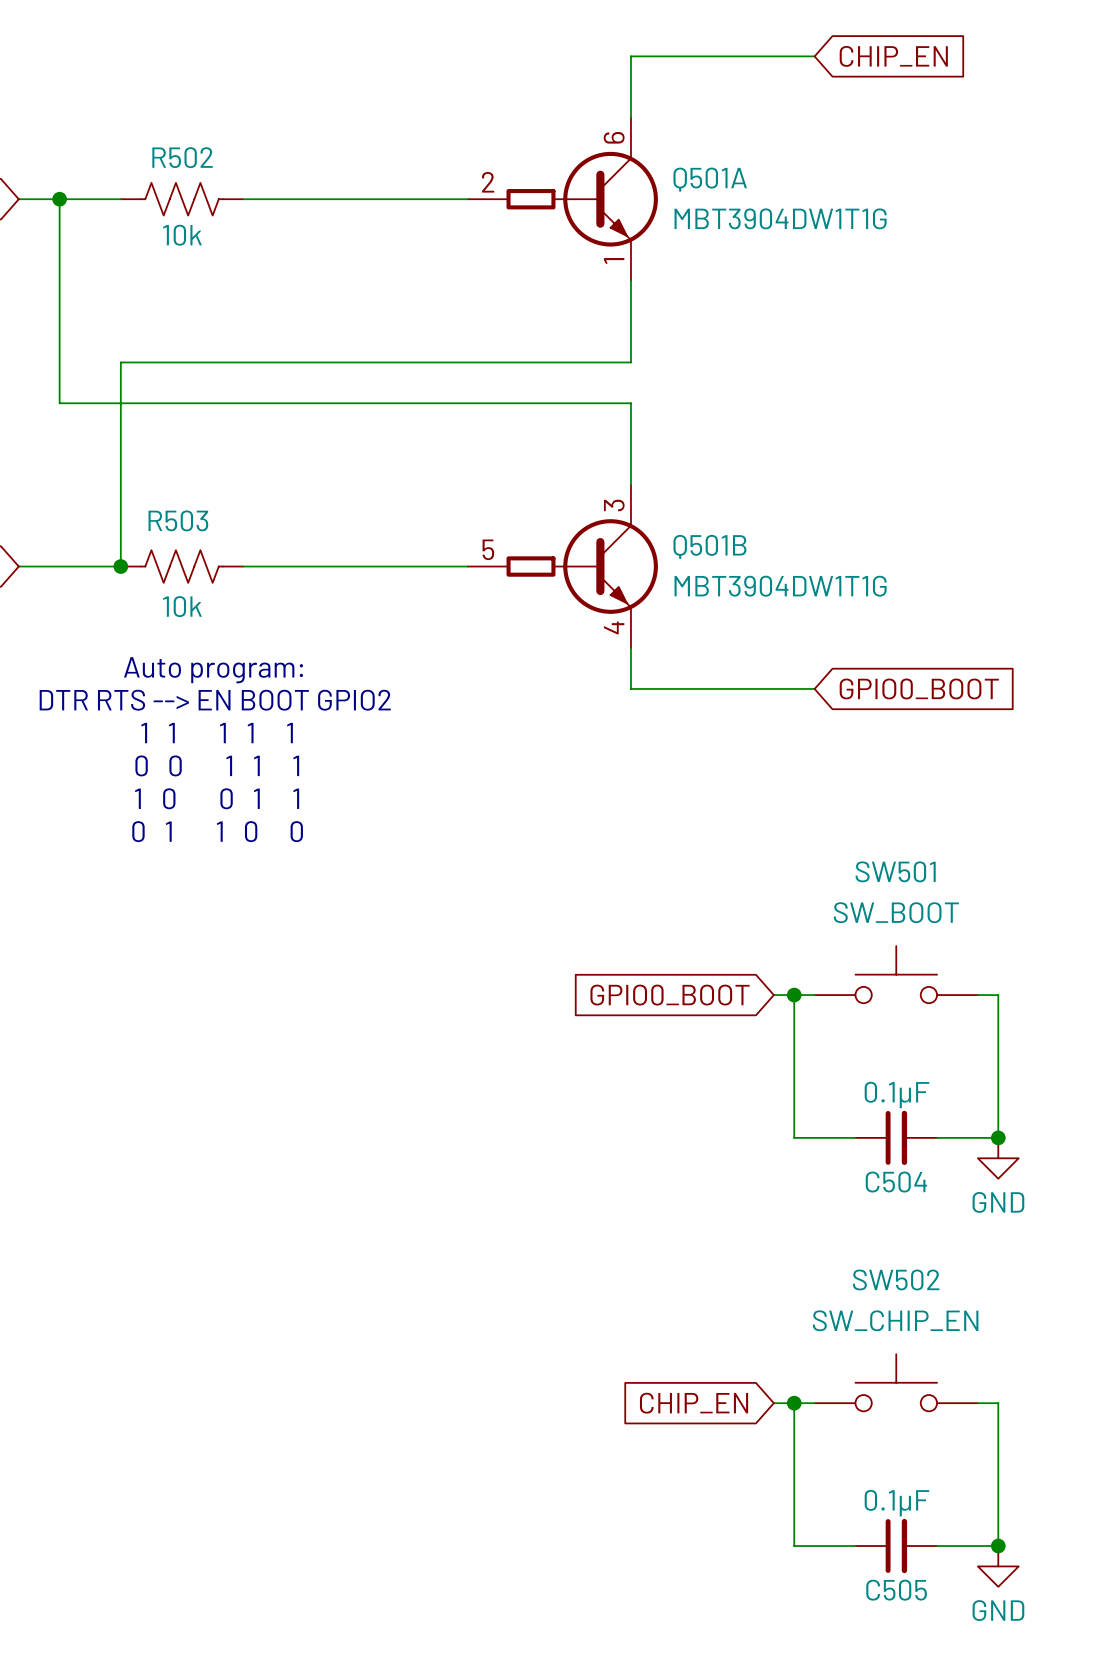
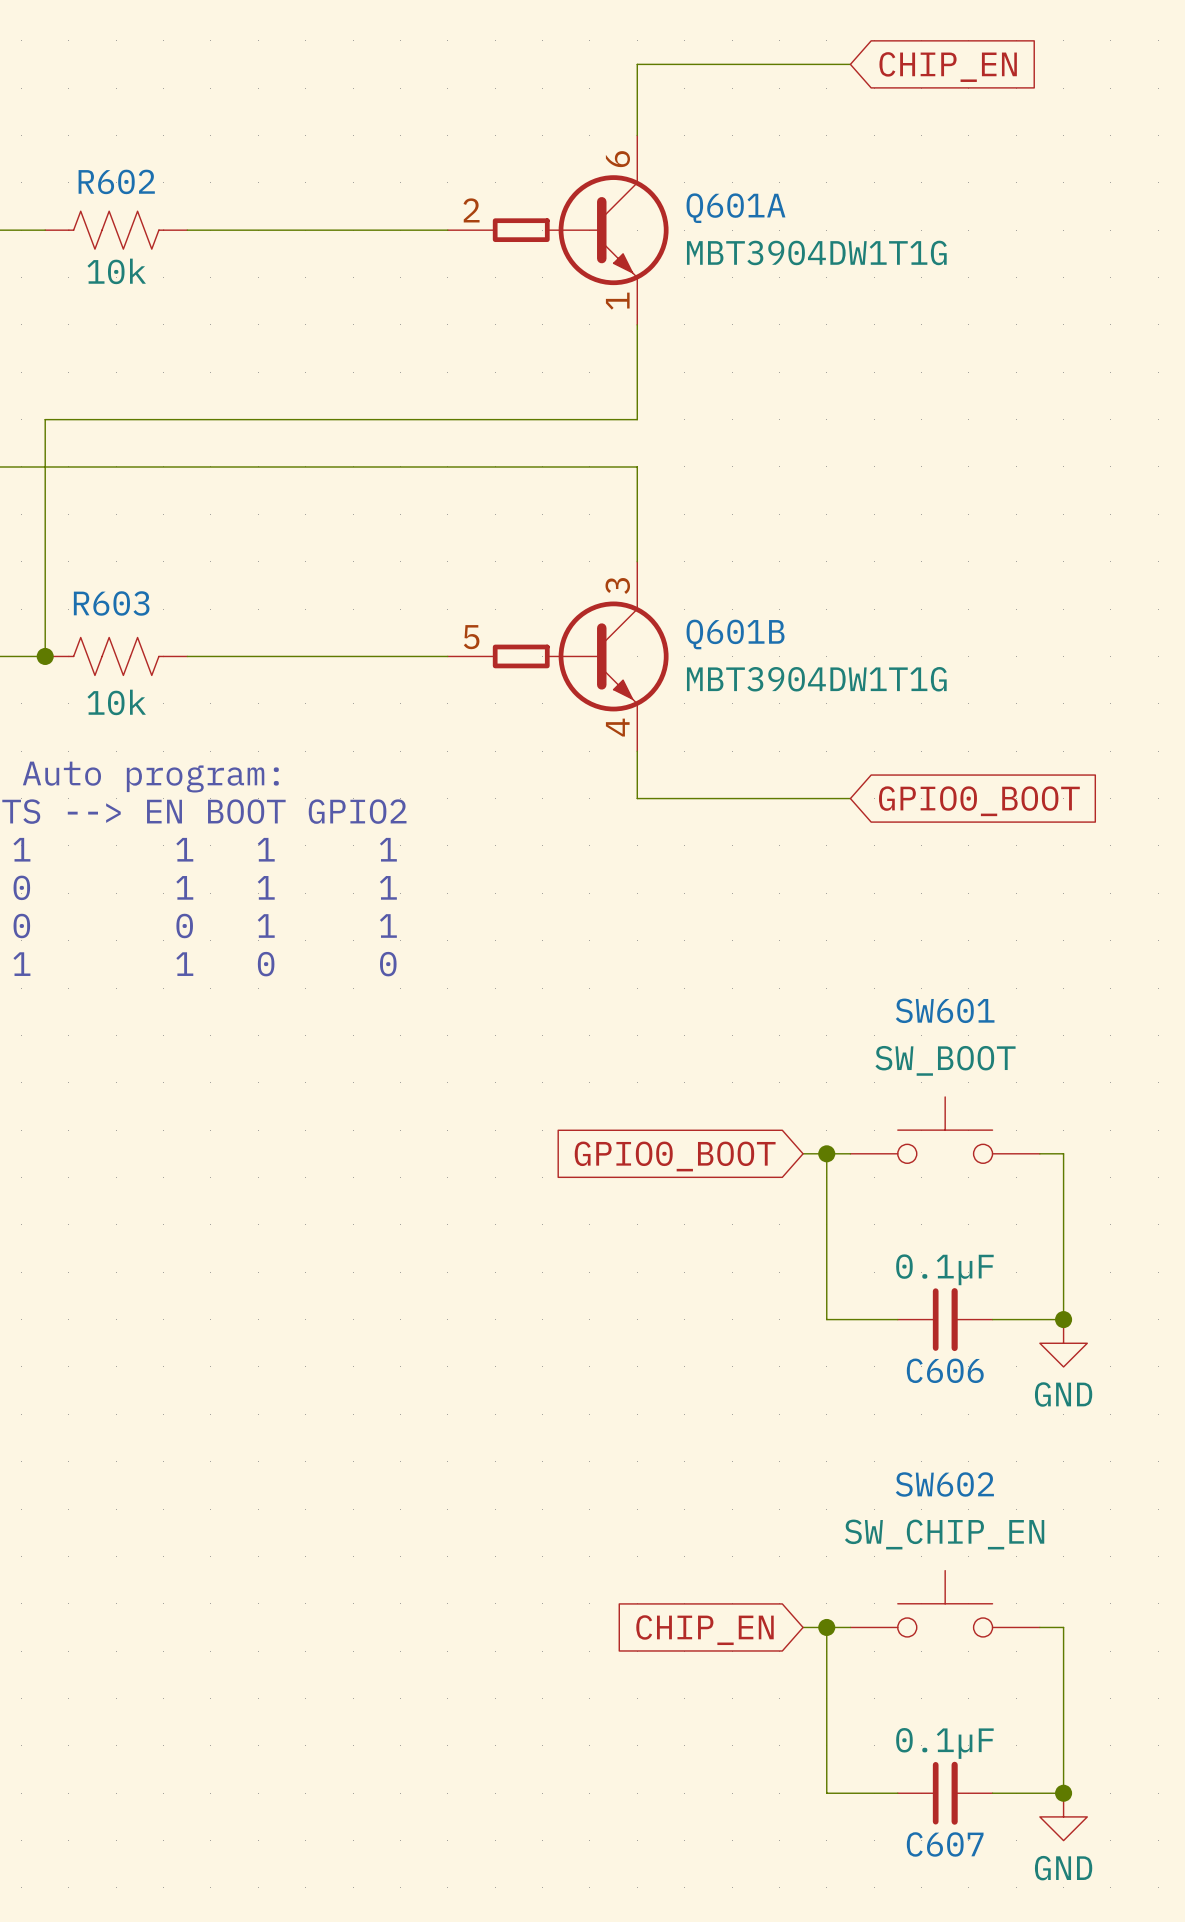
R502 name: R502 (182, 157) -> R602 (116, 181)
Q501A name: Q501A (710, 179) -> Q601A (735, 208)
R503 name: R503 (178, 520) -> R603 (111, 603)
Q501B name: Q501B (709, 546) -> Q601B (735, 634)
SW501 name: SW501 (895, 871) -> SW601 (945, 1010)
C504 name: C504 (896, 1182) -> C606 (945, 1370)
SW502 name: SW502 (896, 1279) -> SW602 (944, 1484)
C505 name: C505 (896, 1590) -> C607 (945, 1844)

